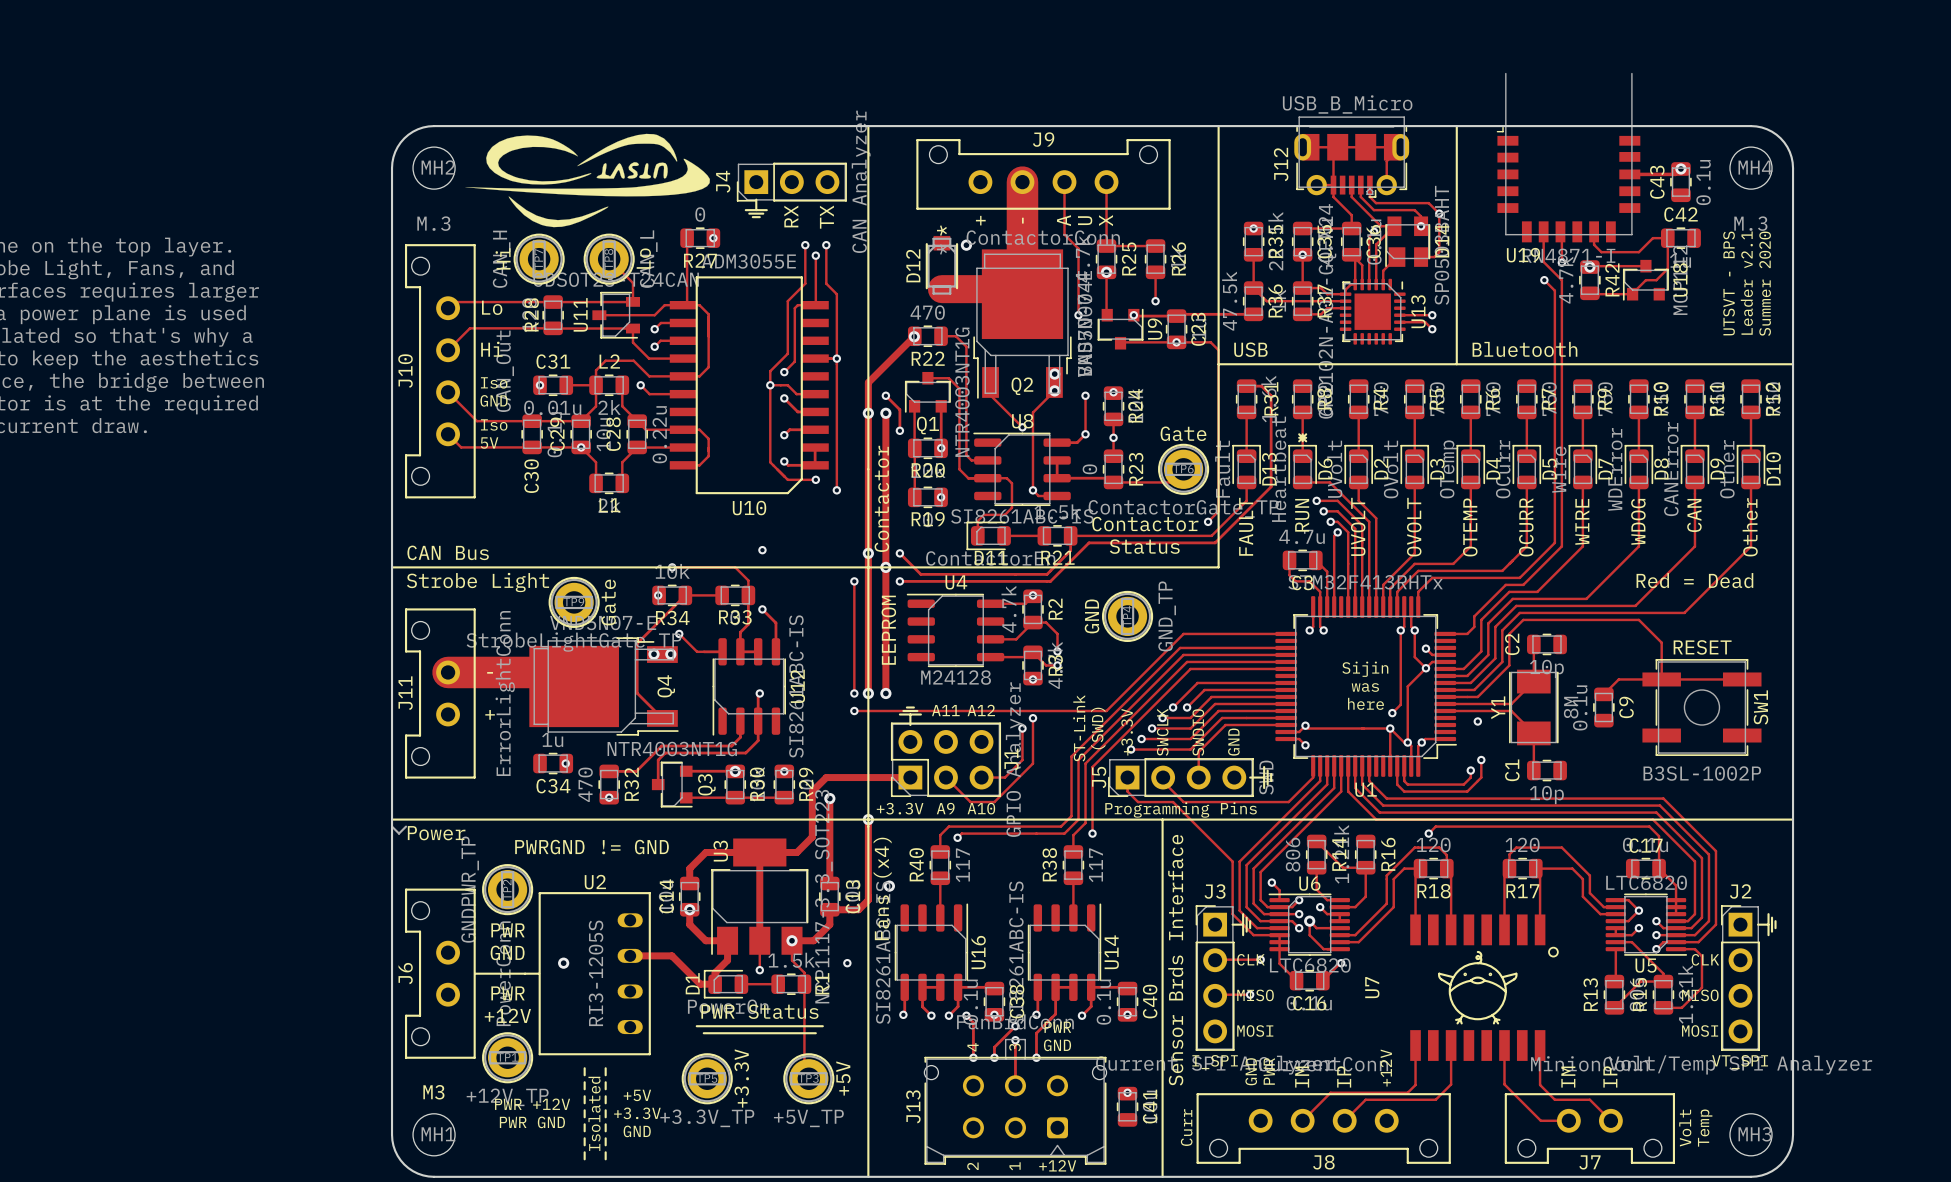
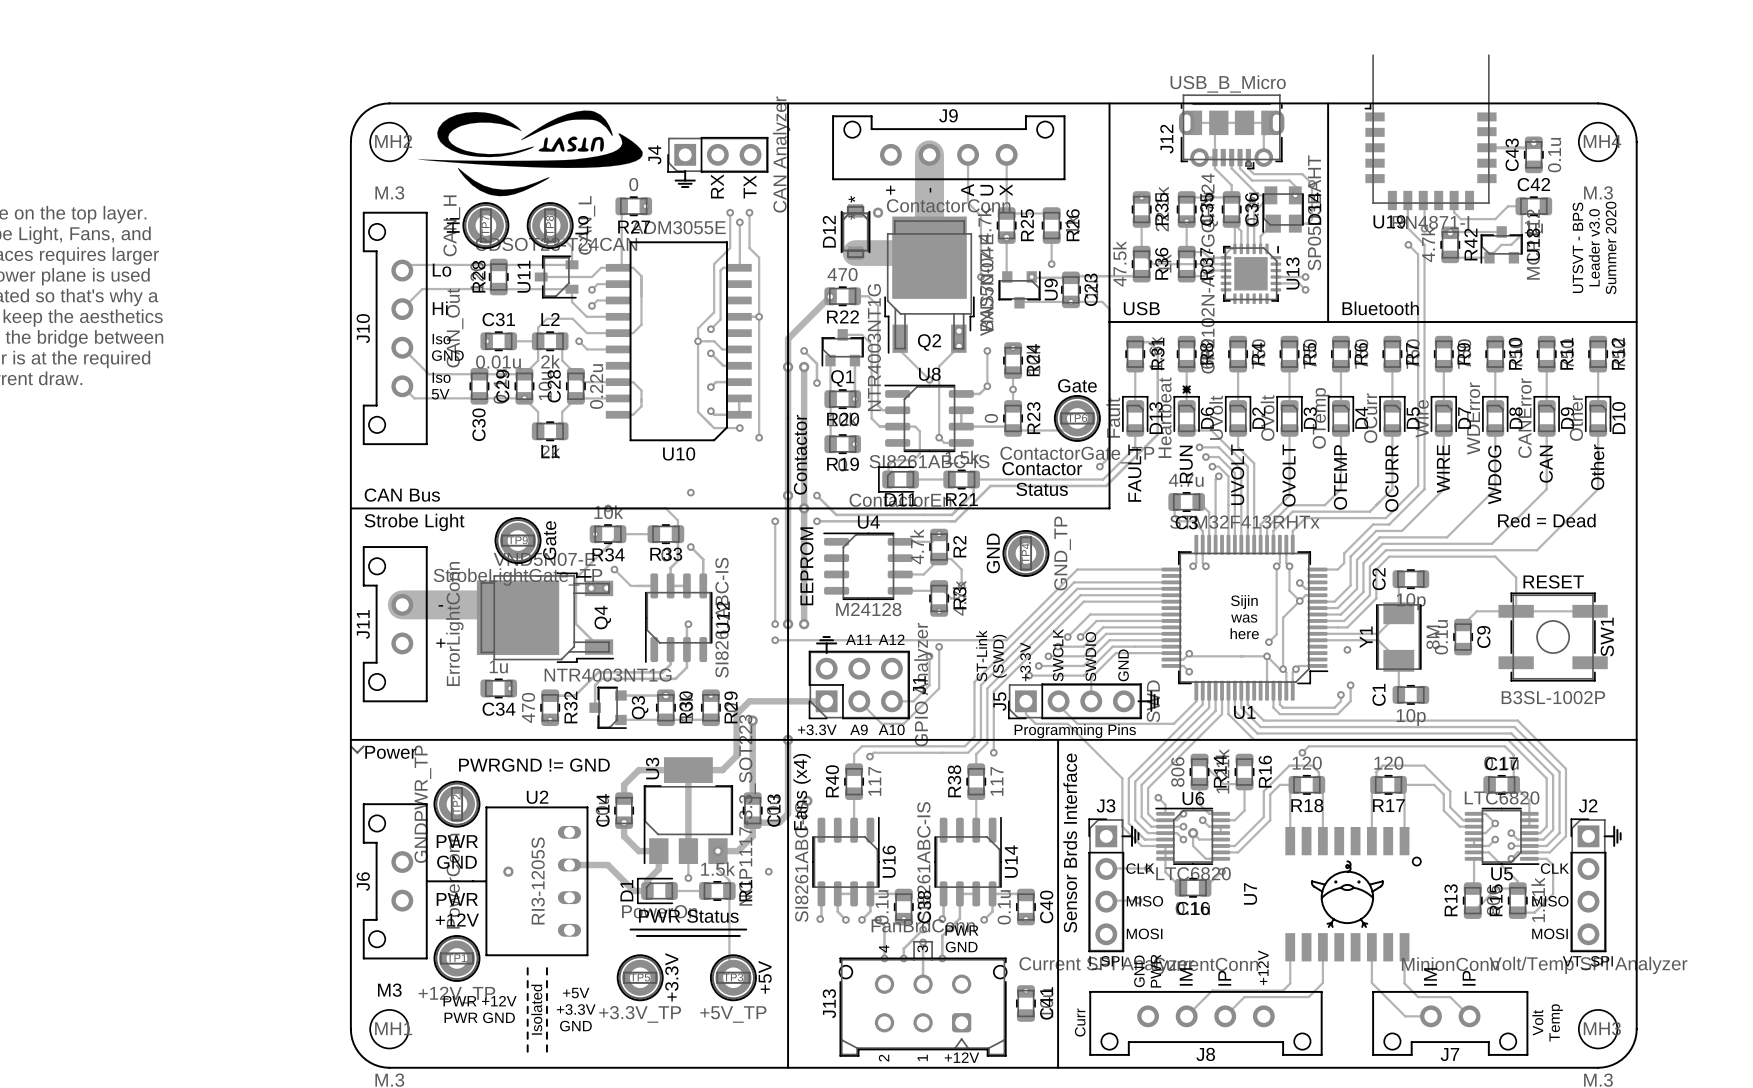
text: Leader v2.1 (1746, 283) -> Leader v3.0 (1594, 247)

